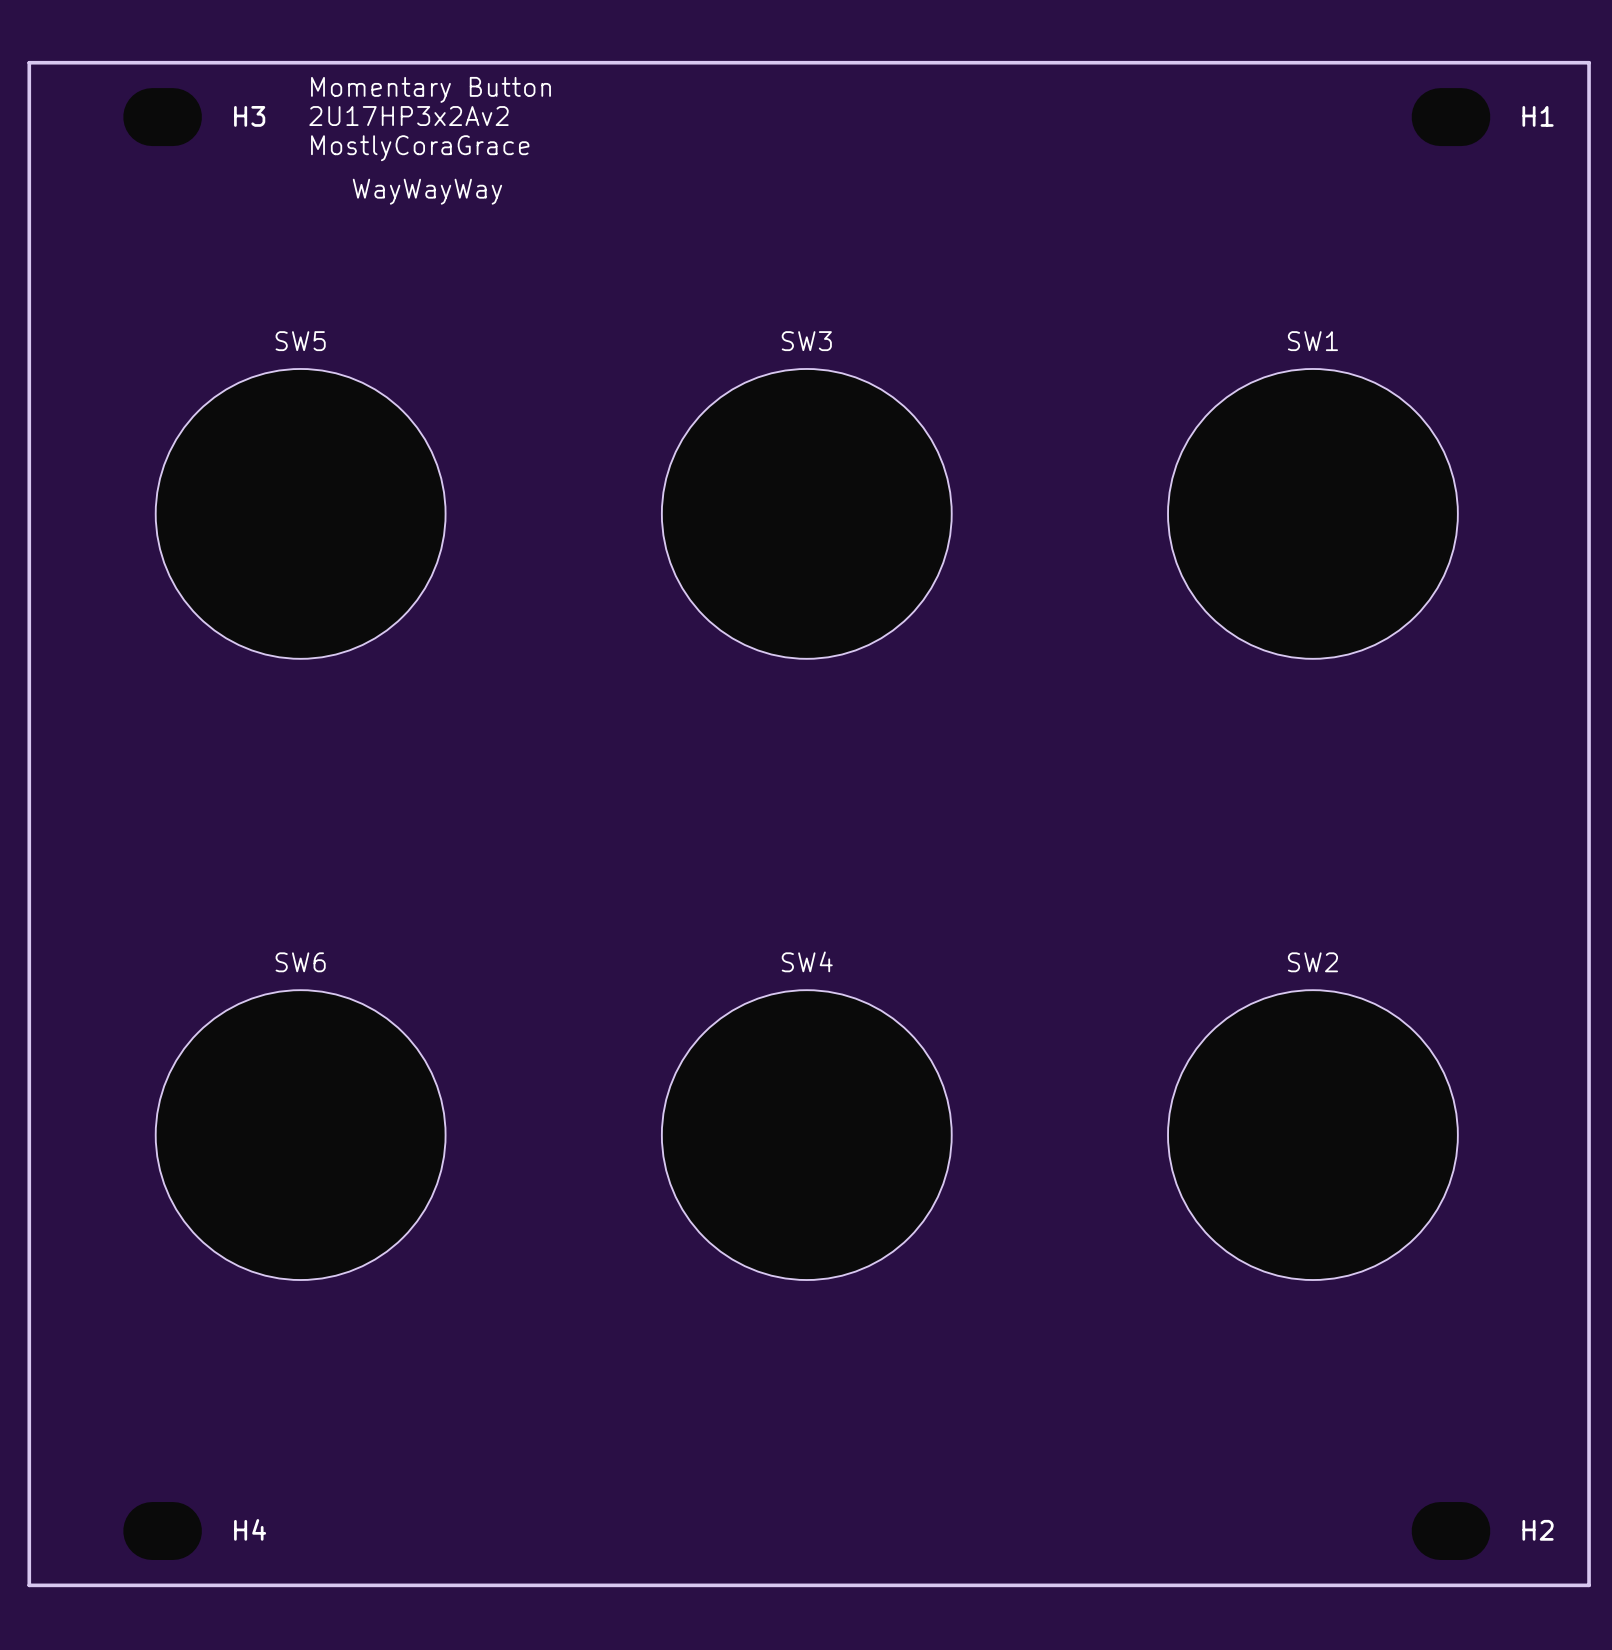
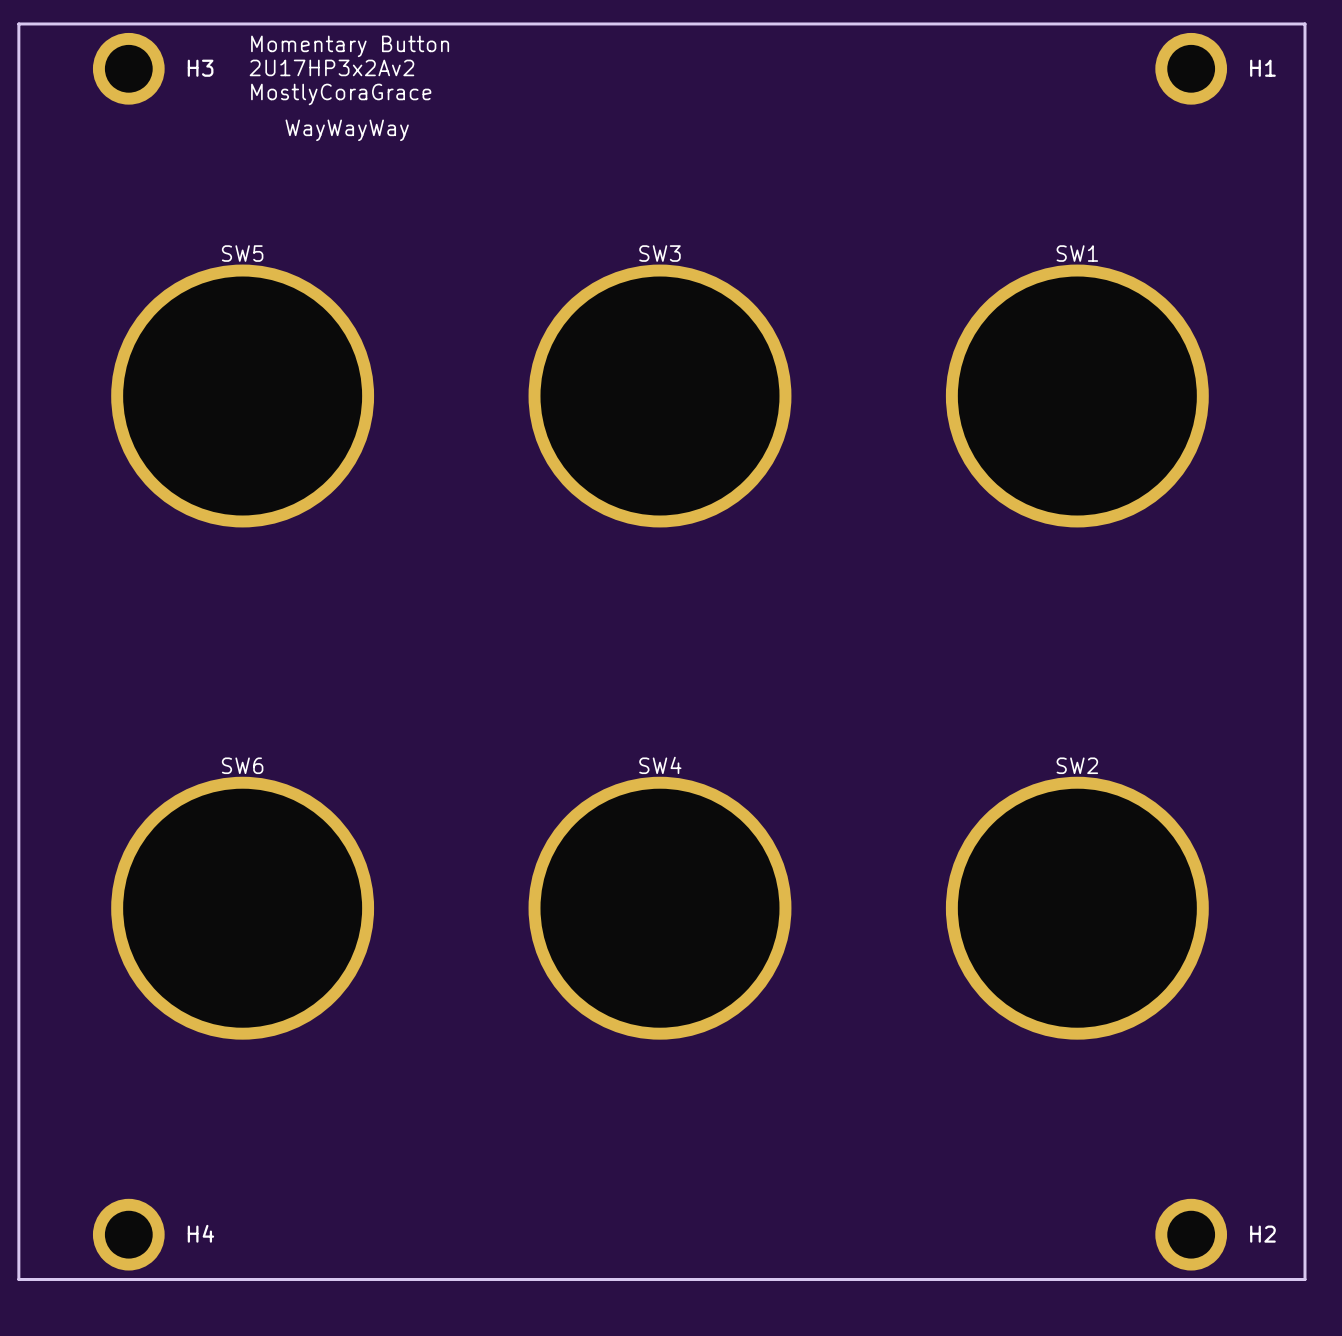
H3 footprint: [123, 88, 202, 147] -> [92, 32, 165, 105]
H1 footprint: [1411, 88, 1491, 147] -> [1155, 32, 1228, 105]
SW5 footprint: [155, 368, 446, 659] -> [111, 264, 375, 528]
SW3 footprint: [661, 368, 952, 659] -> [528, 264, 792, 528]
SW1 footprint: [1168, 368, 1458, 659] -> [945, 264, 1209, 528]
SW6 footprint: [155, 990, 446, 1281] -> [111, 776, 375, 1040]
SW4 footprint: [661, 990, 952, 1281] -> [528, 776, 792, 1040]
SW2 footprint: [1168, 990, 1458, 1281] -> [945, 776, 1209, 1040]
H4 footprint: [123, 1502, 202, 1560] -> [92, 1198, 165, 1271]
H2 footprint: [1411, 1502, 1491, 1560] -> [1155, 1198, 1228, 1271]

